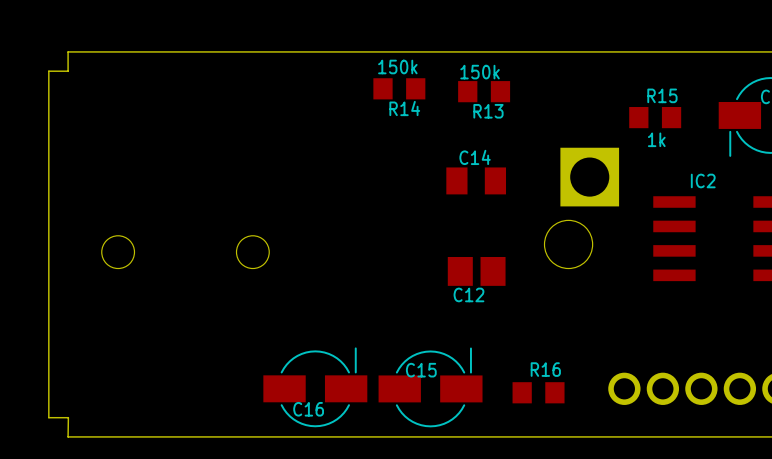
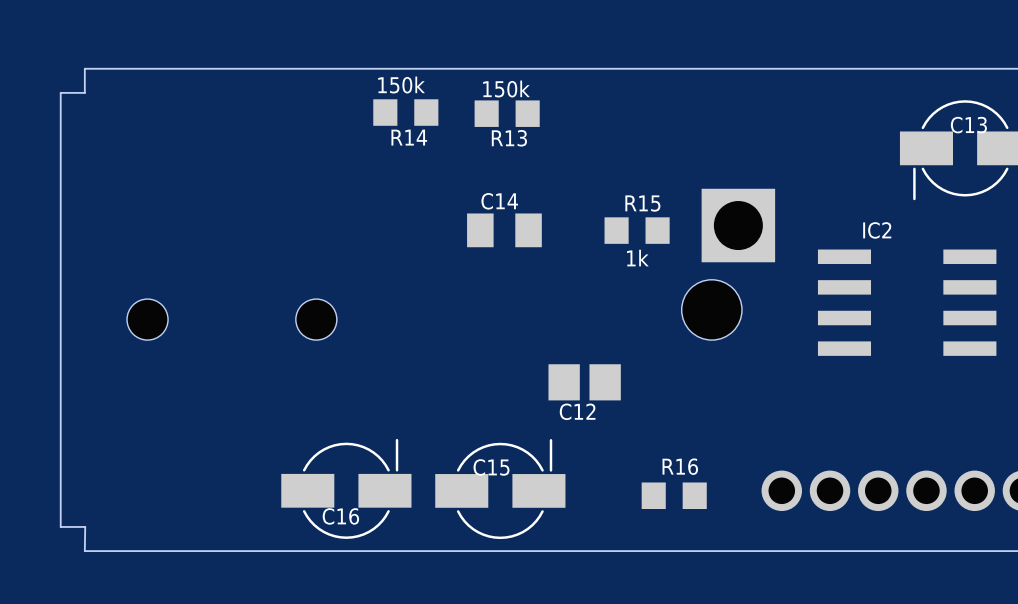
R14 position: (399, 88) -> (405, 112)
R13 position: (484, 91) -> (507, 113)
R15 position: (655, 117) -> (637, 230)
C14 position: (476, 180) -> (504, 230)
C12 position: (476, 271) -> (584, 382)
C16 position: (315, 387) -> (346, 488)
C15 position: (430, 387) -> (500, 489)

